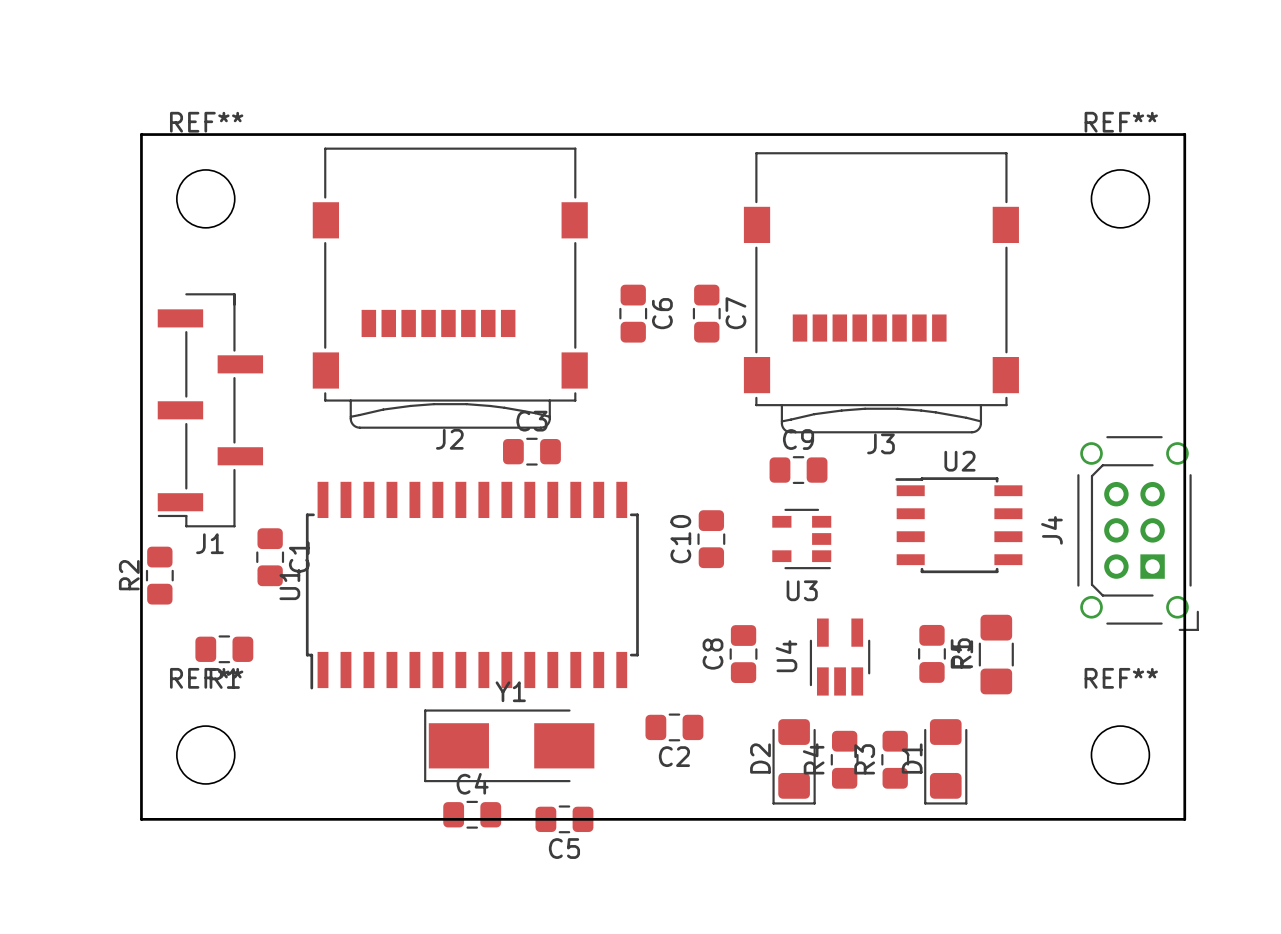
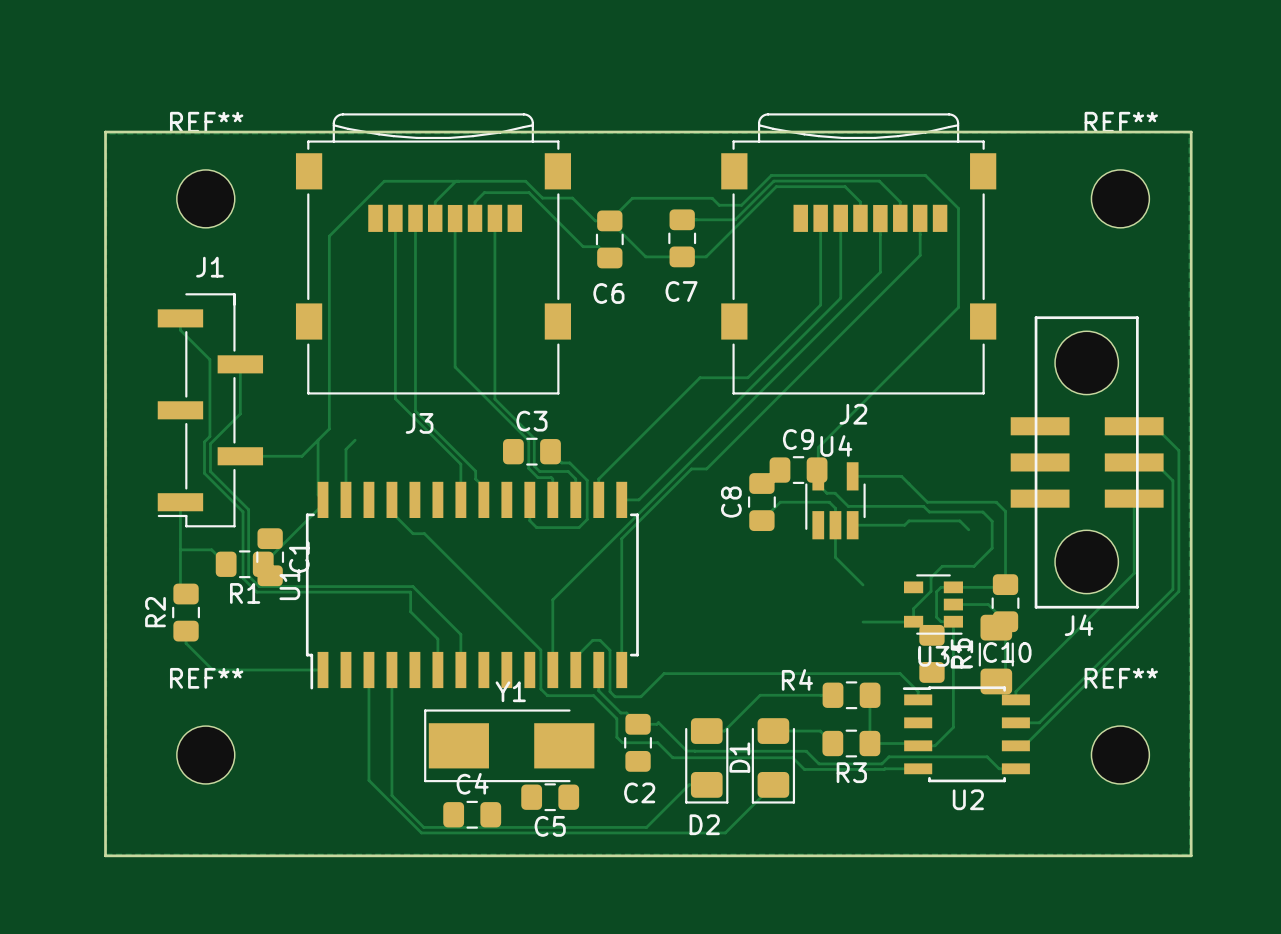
board edge: (141, 134) (141, 819) (1184, 819) (1184, 134) (141, 134) -> (105, 132) (105, 855) (1191, 855) (1191, 132) (105, 132)
track: none -> (455, 181) (435, 202) (435, 218)
track: none -> (395, 218) (395, 398) (460, 464) (460, 499)
track: none -> (415, 218) (415, 411) (475, 471) (475, 479) (483, 487) (483, 499)
track: none -> (455, 218) (455, 367) (528, 440) (528, 468) (537, 477) (552, 479) (552, 499)
track: none -> (475, 218) (475, 202) (484, 192) (529, 192) (583, 246) (598, 246) (609, 257)
track: none -> (494, 218) (494, 399) (534, 438) (534, 466) (539, 471) (568, 471) (575, 479) (575, 499)
track: none -> (820, 218) (820, 304) (747, 377) (700, 377) (598, 479) (598, 499)
track: none -> (840, 218) (840, 298) (638, 499) (621, 499)
track: none -> (860, 218) (860, 202) (845, 186) (776, 186) (706, 256) (645, 256) (609, 220)
track: none -> (880, 218) (880, 272) (552, 599) (552, 670)
track: none -> (900, 218) (900, 202) (879, 181) (773, 181) (735, 219)
track: none -> (920, 218) (920, 255) (706, 468) (691, 468) (621, 538) (621, 670)
track: none -> (682, 219) (735, 219)
track: none -> (609, 220) (595, 220) (572, 198) (542, 198) (525, 181) (384, 181) (329, 236) (329, 428) (301, 456) (240, 456)
track: none -> (609, 220) (632, 198) (712, 198) (719, 205) (741, 205) (771, 175) (925, 175) (958, 208) (958, 307) (818, 447) (818, 484) (826, 493) (835, 493) (848, 506) (923, 506) (929, 512) (982, 512) (992, 521) (992, 548) (974, 566) (942, 566) (931, 577) (931, 591) (913, 608) (913, 622) (863, 622)
J2 rotation: 0° (450, 288) -> 180° (858, 253)
J2 position: (450, 288) -> (858, 253)
J3 rotation: 0° (881, 292) -> 180° (433, 253)
J3 position: (881, 292) -> (433, 253)
C6 position: (633, 313) -> (609, 239)
C6 name rotation: 0° (662, 313) -> 90° clockwise (608, 293)
C6 name position: C6 (662, 313) -> C6 (608, 293)
C7 position: (706, 313) -> (682, 238)
C7 name rotation: 0° (735, 313) -> 90° clockwise (681, 291)
C7 name position: C7 (735, 313) -> C7 (681, 291)
track: none -> (180, 318) (180, 330) (209, 359) (209, 436) (204, 441) (204, 473) (243, 511) (243, 578) (256, 592) (410, 592) (410, 611) (437, 639) (437, 670)
track: none -> (240, 364) (240, 413) (210, 443) (210, 471) (248, 509) (248, 575) (259, 586) (412, 586) (460, 634) (460, 670)
track: none -> (1134, 426) (1154, 426) (1178, 450) (1178, 591) (1024, 745) (1015, 745)
J4 footprint: [1077, 436, 1199, 631] -> [1010, 316, 1164, 609]
track: none -> (318, 440) (318, 494) (323, 499) (323, 504) (263, 564)
track: none -> (355, 440) (345, 449) (345, 499)
track: none -> (550, 451) (561, 462) (569, 462) (587, 480) (587, 519) (579, 527) (536, 527) (529, 520) (529, 499)
U2 name position: U2 (959, 461) -> U2 (968, 799)
track: none -> (1134, 462) (1154, 462) (1172, 480) (1172, 589) (1039, 722) (1015, 722)
track: none -> (852, 476) (901, 476) (927, 502) (996, 502) (1005, 511) (1005, 584) (1002, 587) (941, 587) (936, 591) (936, 617) (941, 621) (953, 621) (953, 727) (934, 745) (918, 745) (915, 743) (869, 743) (869, 695)
track: none -> (1134, 498) (1134, 573) (1015, 691) (1015, 699) (1007, 699) (1005, 697) (1005, 621) (988, 604) (953, 604)
track: none -> (391, 499) (391, 512) (413, 533) (424, 533) (540, 650) (540, 689) (547, 695) (593, 695) (616, 718) (616, 737) (622, 742) (657, 742) (672, 757) (792, 757) (804, 769) (918, 768)
track: none -> (180, 502) (180, 588) (186, 594)
track: none -> (761, 520) (780, 502) (829, 502) (835, 508) (835, 557) (863, 584)
track: none -> (852, 525) (904, 525) (908, 520) (959, 520) (968, 529)
U2 position: (958, 525) -> (966, 734)
J4 name position: J4 (1051, 530) -> J4 (1079, 625)
U3 position: (801, 538) -> (933, 604)
C10 name rotation: 0° (680, 539) -> 90° clockwise (1007, 652)
C10 position: (711, 539) -> (1005, 603)
J1 name position: J1 (209, 543) -> J1 (209, 267)
track: none -> (180, 549) (211, 549) (226, 564)
R2 position: (159, 575) -> (186, 612)
track: none -> (186, 631) (186, 643) (212, 670) (323, 670)
R1 position: (224, 649) -> (244, 564)
C8 position: (743, 654) -> (761, 502)
U4 name rotation: 0° (786, 656) -> 90° clockwise (836, 445)
U4 name position: U4 (786, 656) -> U4 (836, 445)
U4 position: (840, 657) -> (835, 500)
track: none -> (368, 670) (368, 780) (421, 832) (725, 832) (773, 784)
track: none -> (391, 670) (391, 795) (423, 827) (646, 827) (689, 784) (706, 784)
track: none -> (575, 670) (575, 657) (592, 640) (600, 640) (610, 650) (610, 691) (615, 696) (640, 696) (664, 673) (900, 673) (918, 691) (918, 699)
track: none -> (598, 670) (598, 690) (620, 713) (626, 713) (638, 724) (658, 722) (686, 751) (694, 751)
track: none -> (833, 695) (760, 695) (724, 731) (706, 731)
C2 rotation: 0° (674, 727) -> 90° clockwise (638, 742)
C2 position: (674, 727) -> (638, 742)
track: none -> (773, 731) (820, 731) (832, 743)
track: none -> (695, 751) (806, 751) (818, 763) (881, 763) (889, 756) (987, 756) (999, 768) (1015, 768)
D2 name rotation: 0° (760, 758) -> 90° clockwise (704, 824)
D2 name position: D2 (760, 758) -> D2 (704, 824)
R4 rotation: 0° (844, 759) -> 90° clockwise (851, 695)
R4 position: (844, 759) -> (851, 695)
R3 name position: R3 (864, 759) -> R3 (851, 772)
R3 rotation: 0° (895, 759) -> 90° clockwise (851, 743)
R3 position: (895, 759) -> (851, 743)
D2 position: (794, 761) -> (706, 760)
D1 position: (945, 761) -> (773, 760)
C5 position: (564, 819) -> (550, 797)

